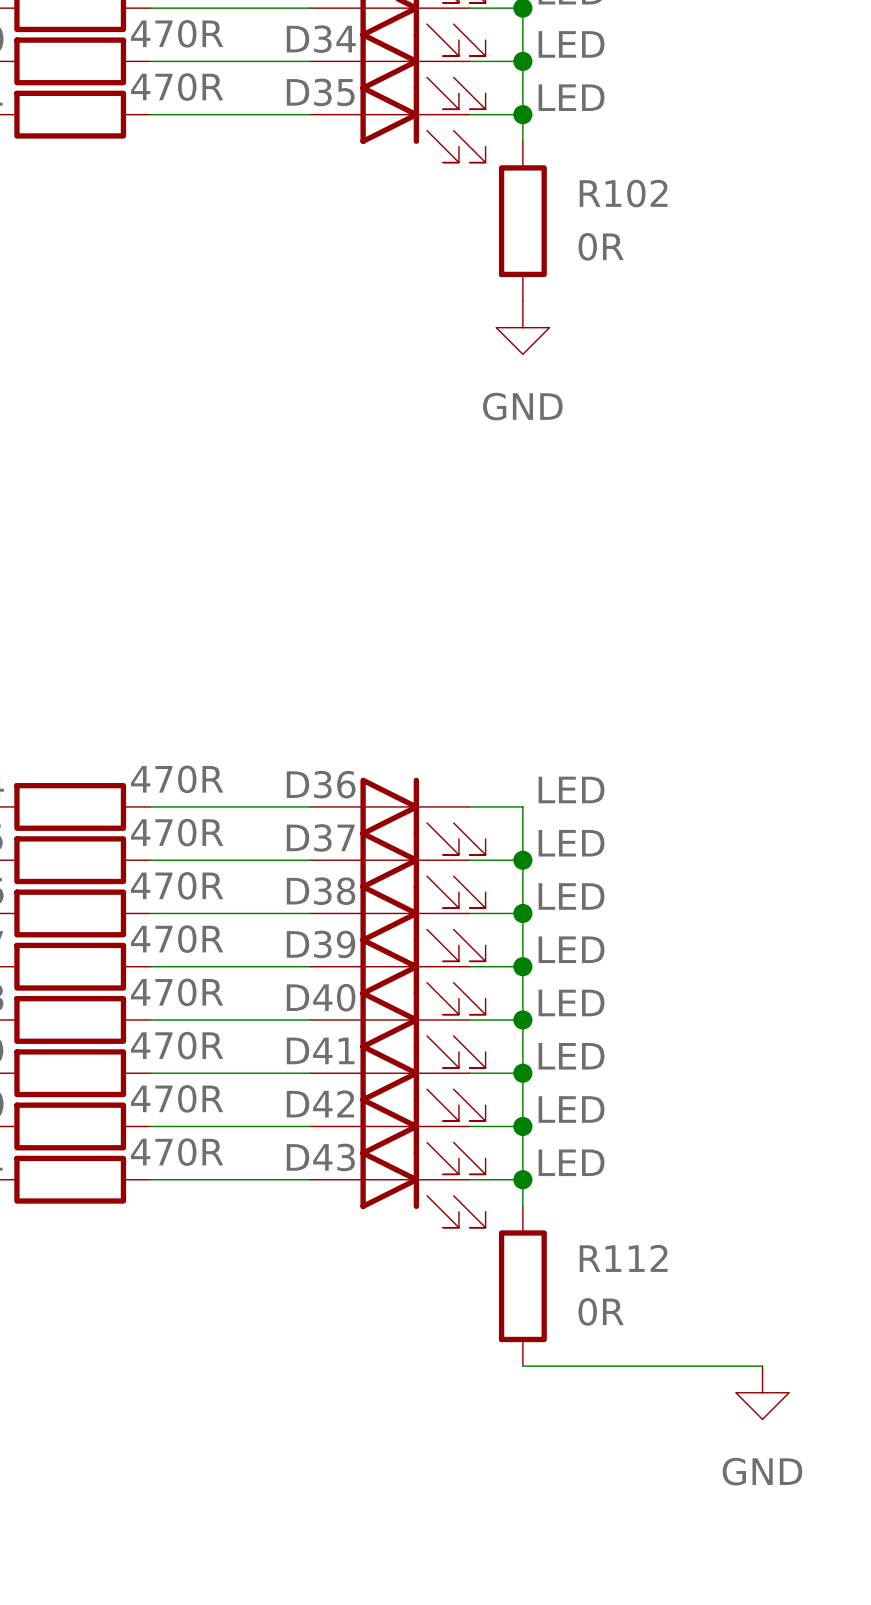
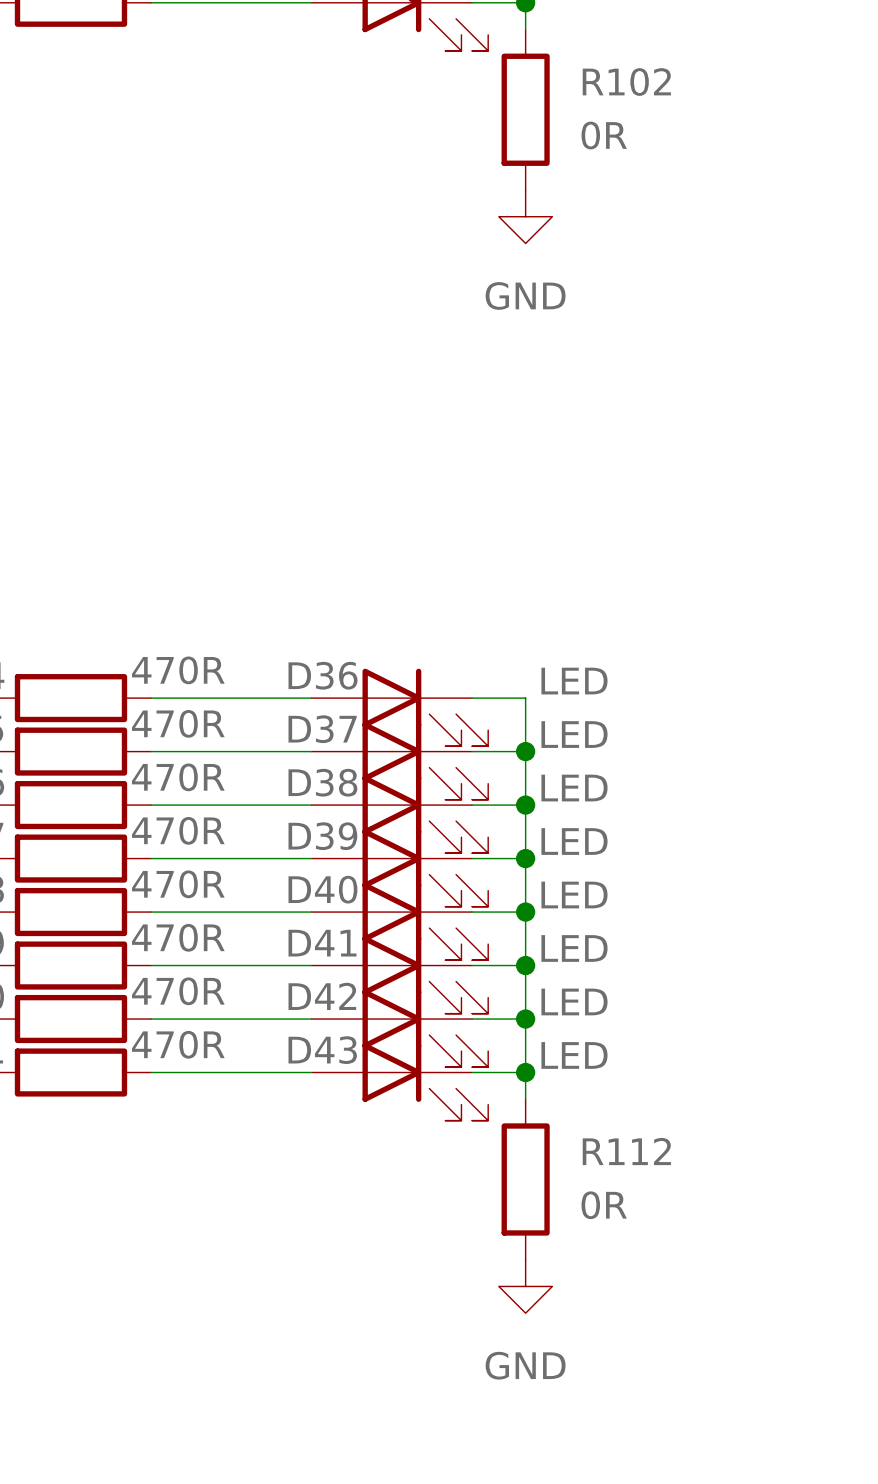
wire: (522, 1366) (762, 1366) -> none
power symbol position: GND (762, 1392) -> GND (525, 1286)

